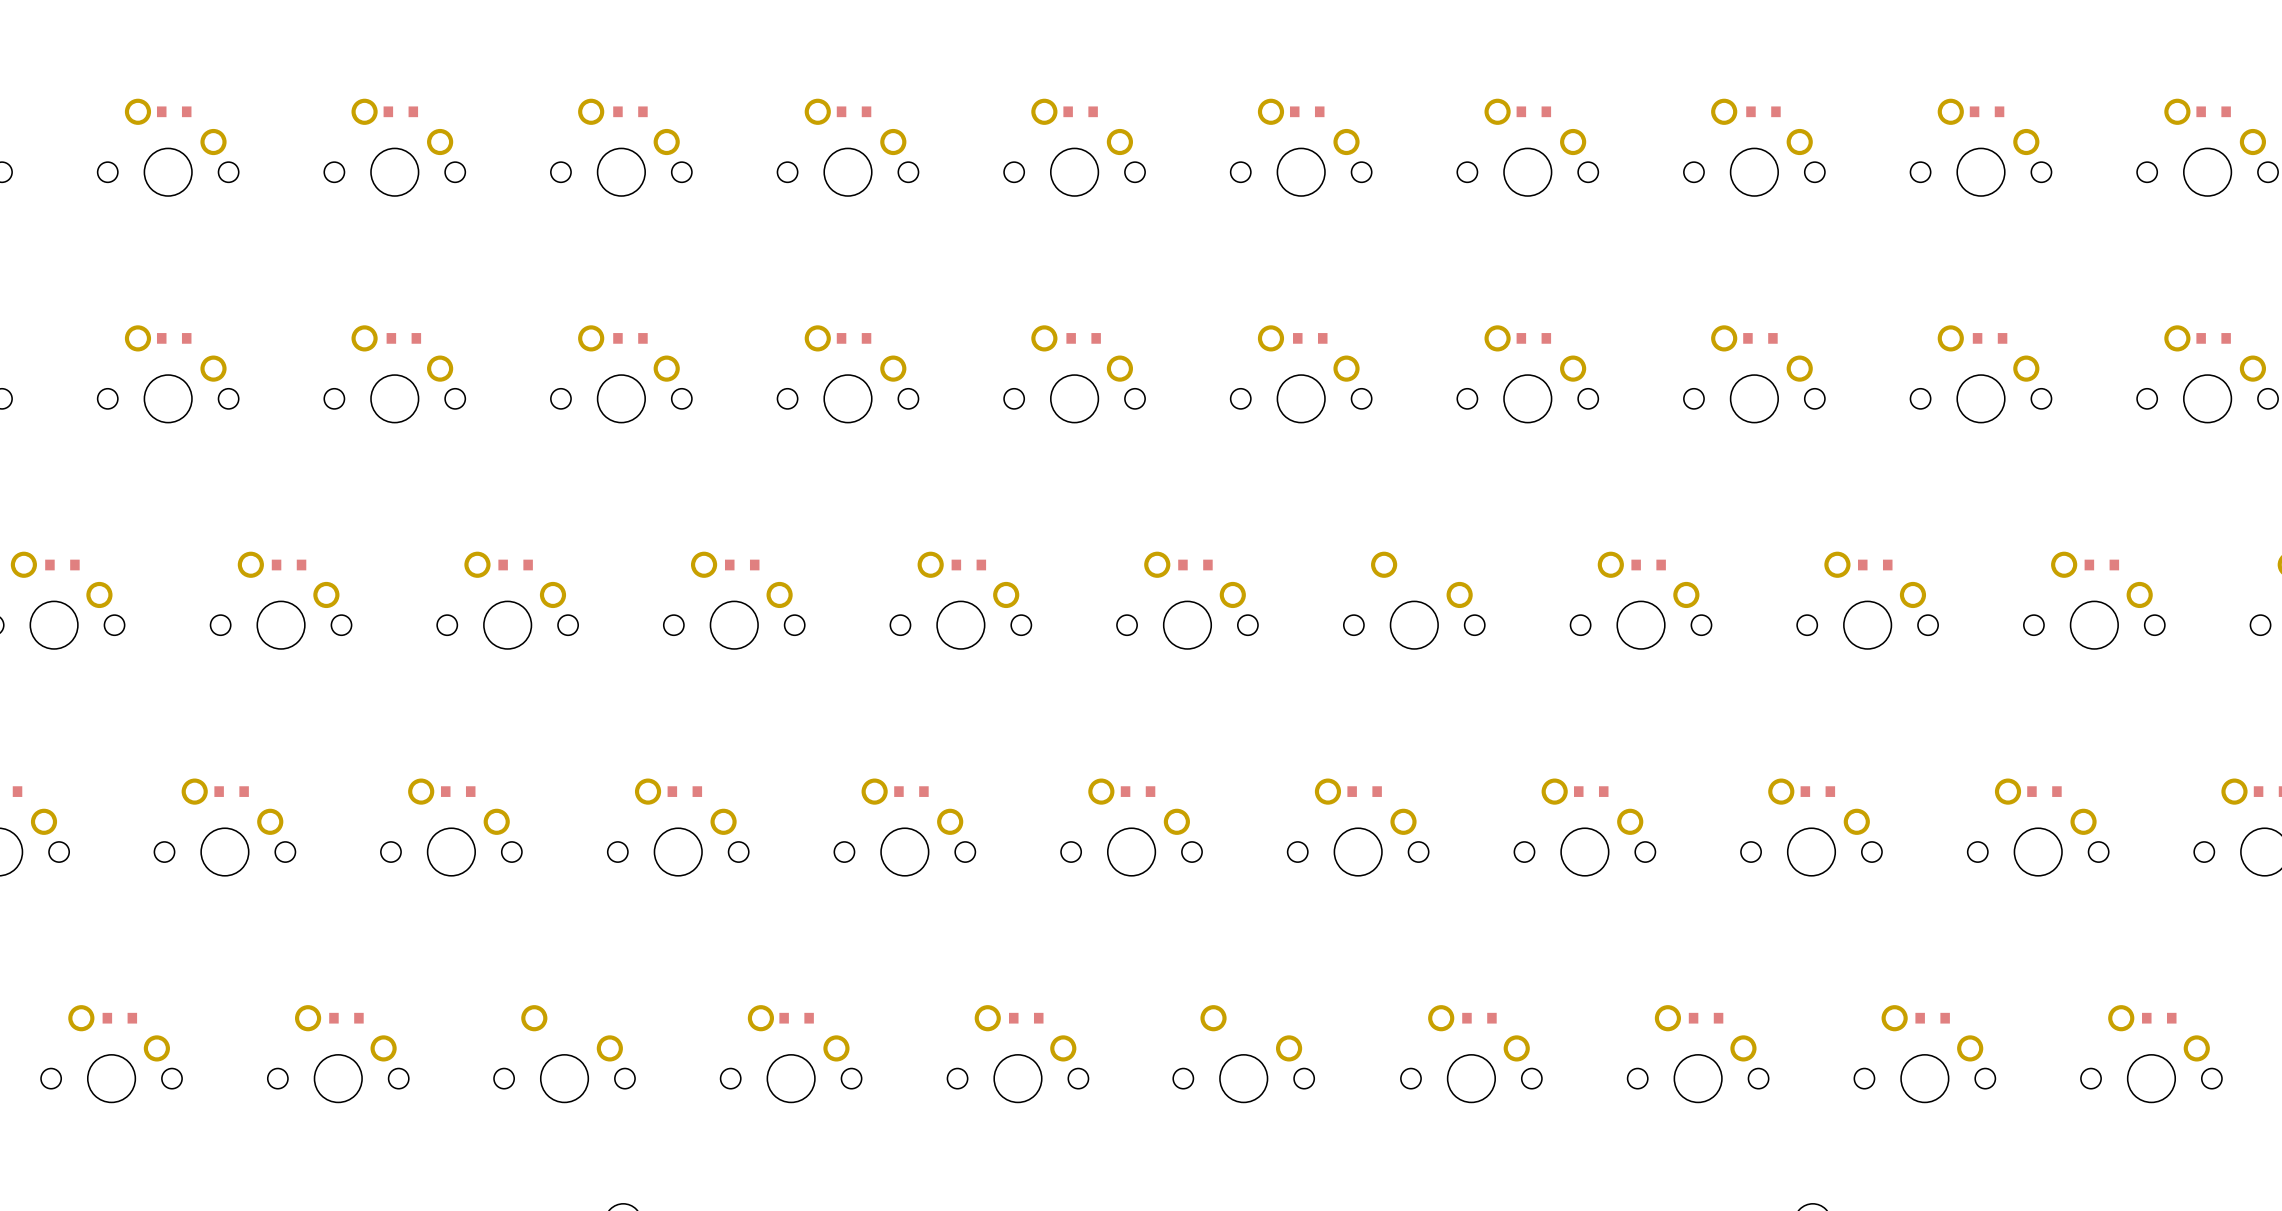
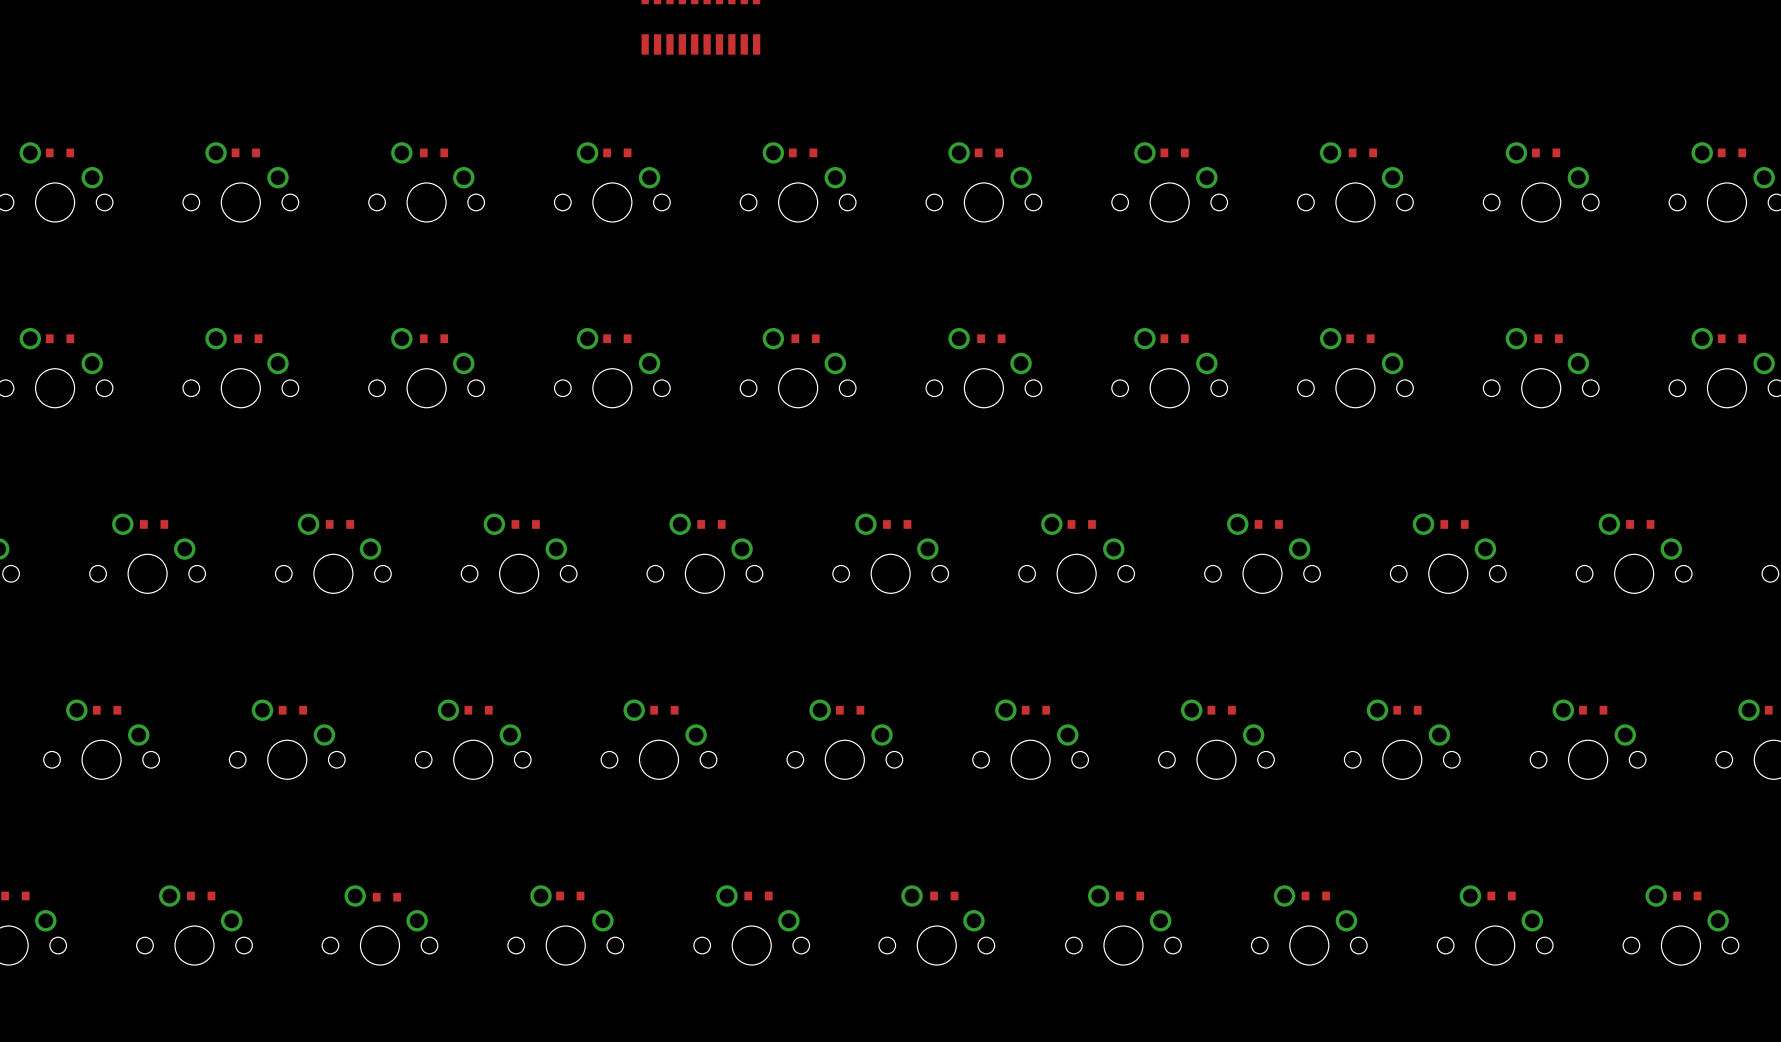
part: none -> (1081, 524)
part: none -> (944, 896)
part: none -> (386, 897)

